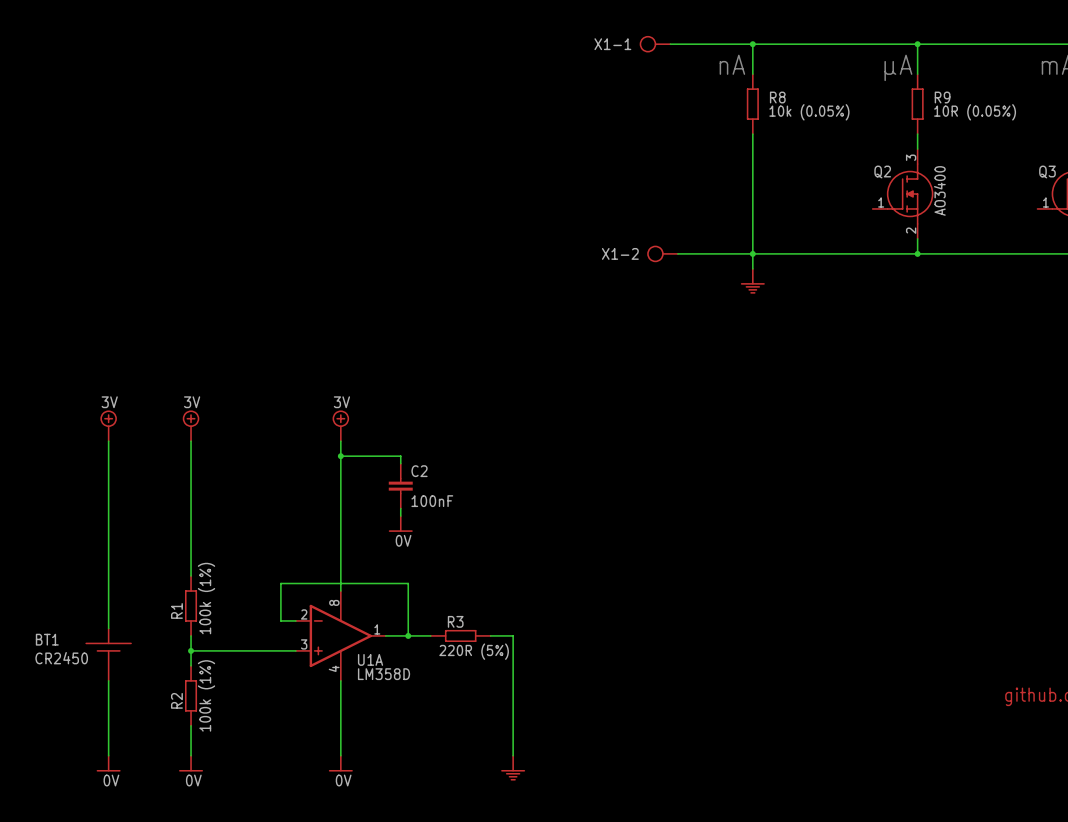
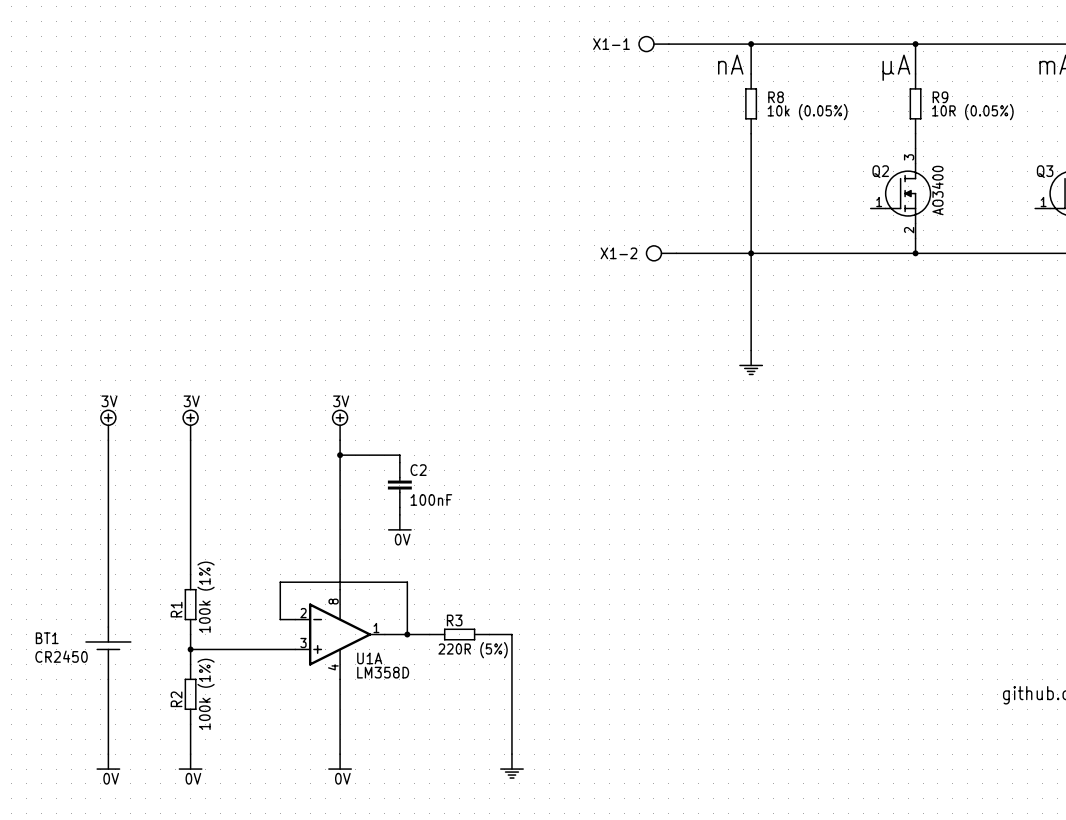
wire: none -> (751, 268) (751, 350)
power symbol position: (752, 281) -> (751, 362)

